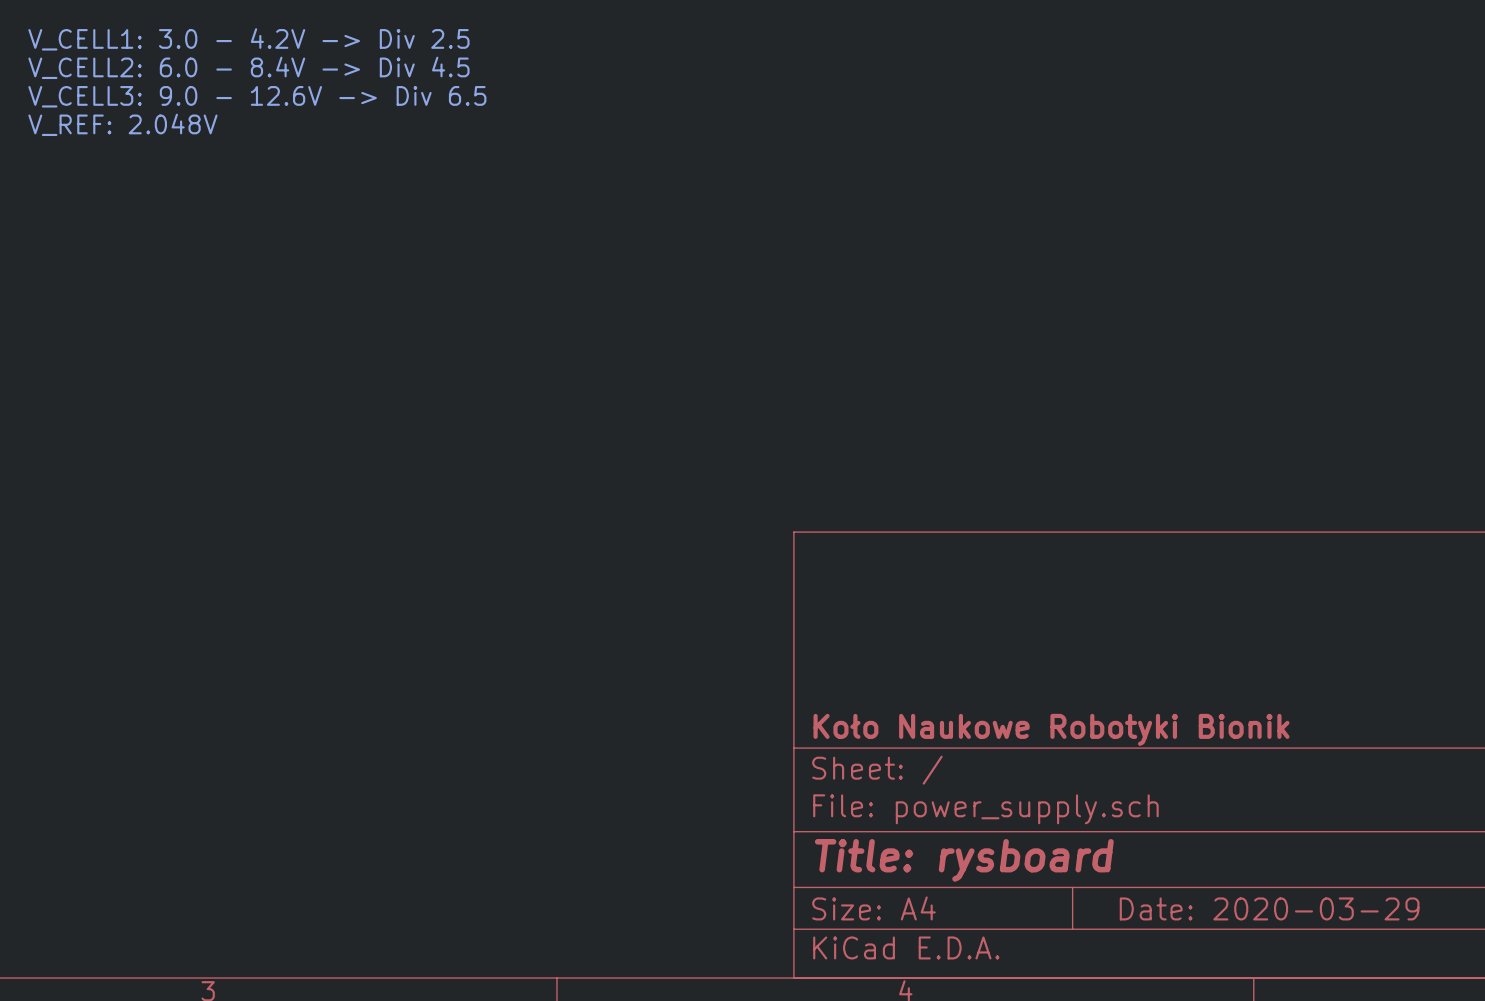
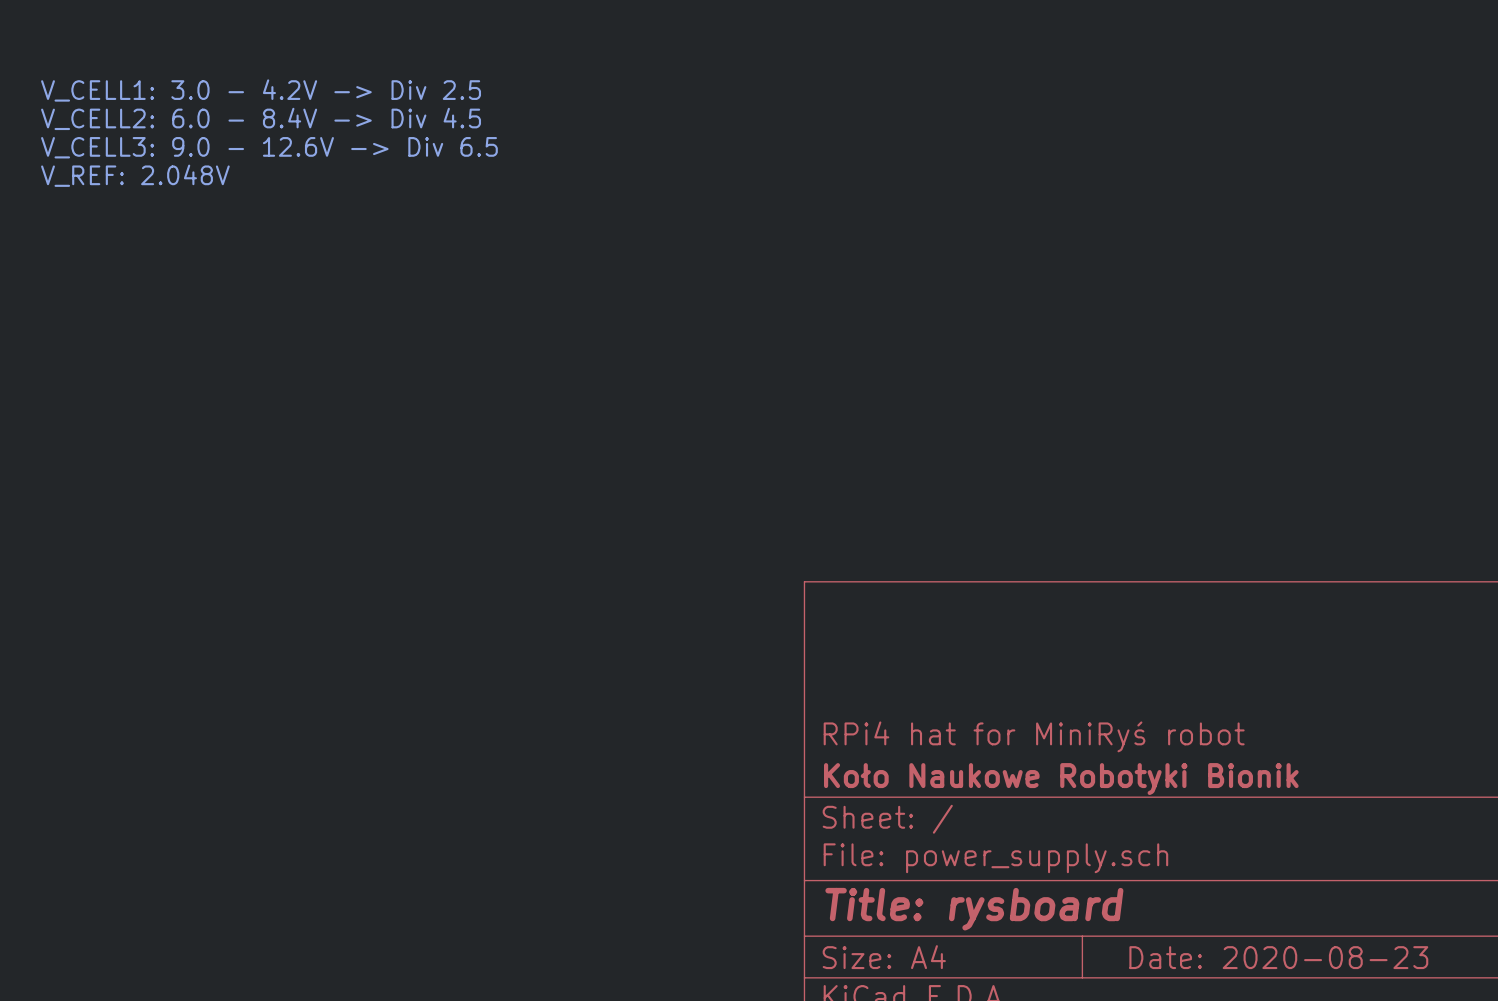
title block: none -> RPi4 hat for MiniRyś robot (1034, 736)
title block: Date: 2020-03-29 (1269, 908) -> Date: 2020-08-23 (1278, 957)

